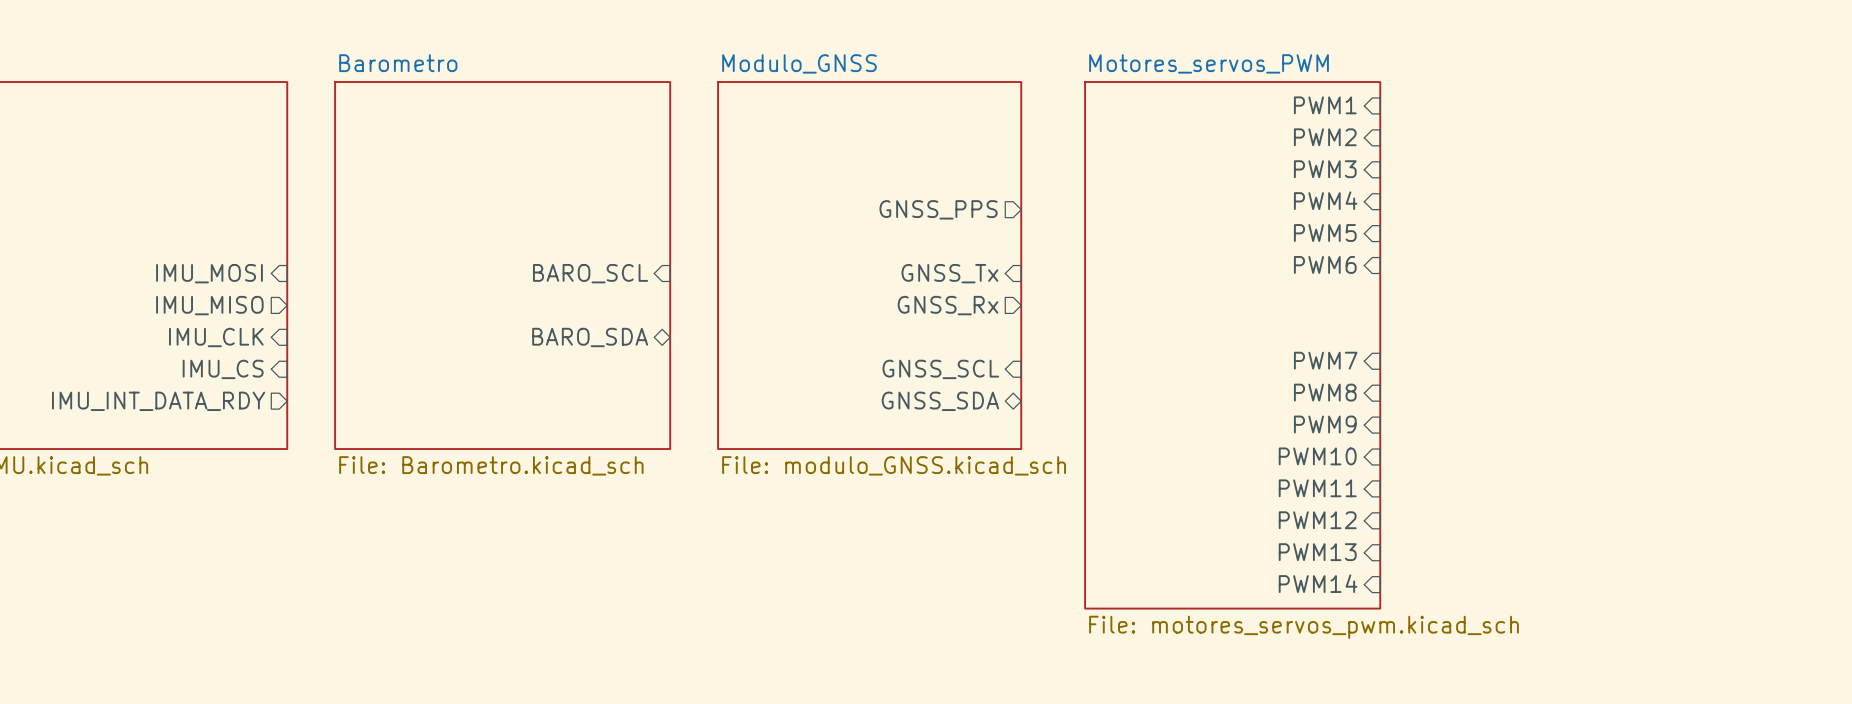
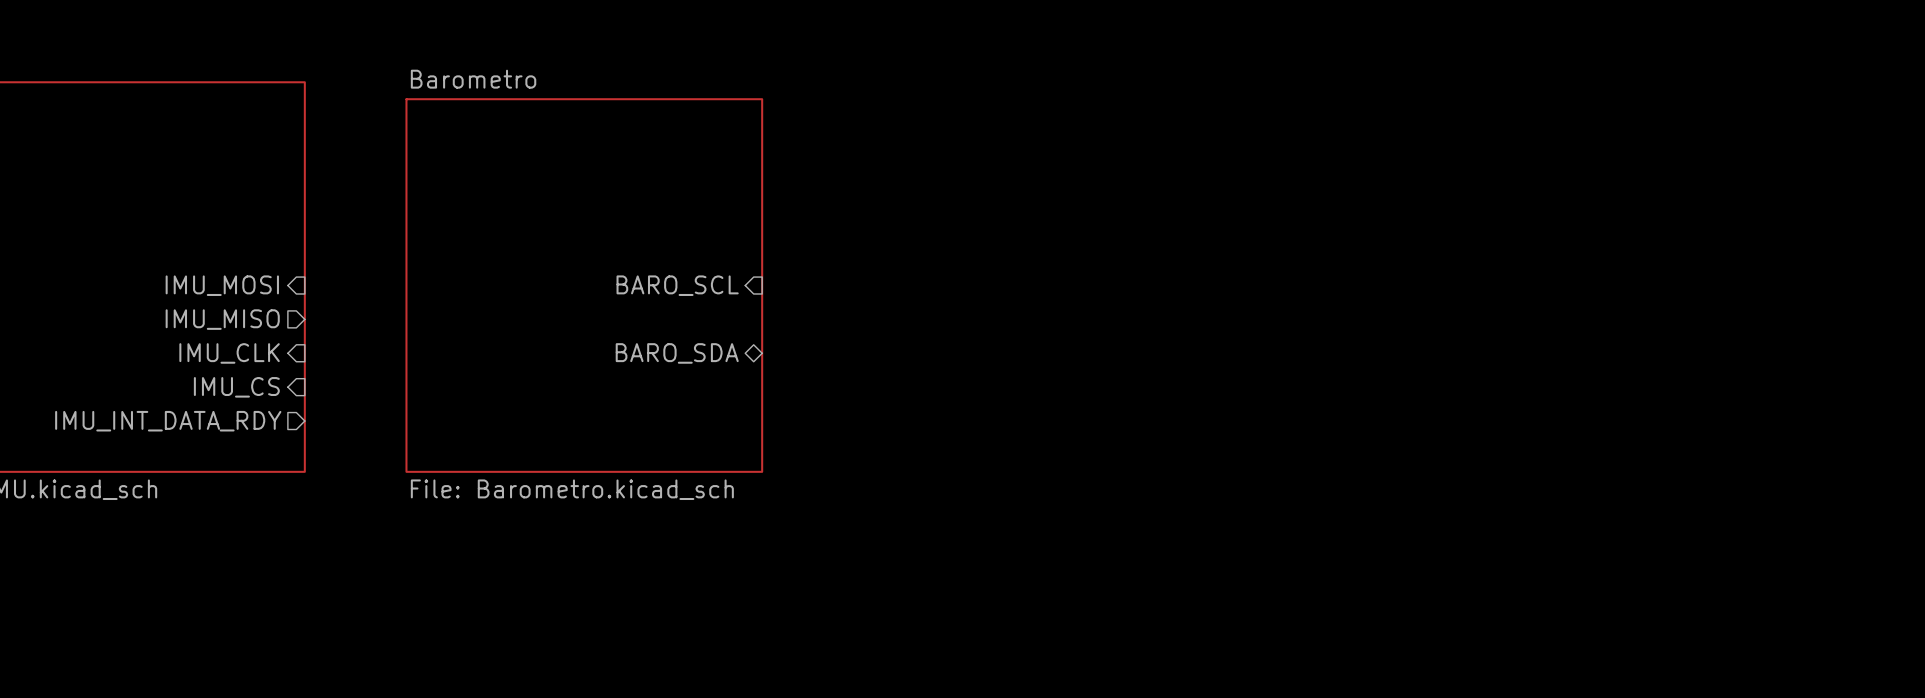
sheet pin: PWM1 (1325, 105) -> none
sheet pin: PWM2 (1325, 137) -> none
sheet pin: PWM3 (1325, 169) -> none
sheet pin: PWM4 (1325, 200) -> none
sheet pin: GNSS_PPS (938, 209) -> none
sheet pin: PWM5 (1325, 233) -> none
sheet pin: PWM6 (1325, 264) -> none
sheet Barometro: File: Barometro.kicad_sch (502, 265) -> none
sheet Modulo_GNSS: File: modulo_GNSS.kicad_sch (869, 265) -> none
sheet Barometro: none -> File: Barometro.kicad_sch (584, 285)
sheet pin position: BARO_SCL (590, 273) -> BARO_SCL (677, 285)
sheet pin: GNSS_Tx (949, 273) -> none
sheet pin: GNSS_Rx (948, 305) -> none
sheet pin position: BARO_SDA (590, 337) -> BARO_SDA (677, 353)
sheet Motores_servos_PWM: File: motores_servos_pwm.kicad_sch (1232, 345) -> none
sheet pin: PWM7 (1325, 360) -> none
sheet pin: GNSS_SCL (940, 369) -> none
sheet pin: PWM8 (1325, 392) -> none
sheet pin: GNSS_SDA (940, 401) -> none
sheet pin: PWM9 (1325, 424) -> none
sheet pin: PWM10 (1317, 456) -> none
sheet pin: PWM11 (1317, 488) -> none
sheet pin: PWM12 (1317, 520) -> none
sheet pin: PWM13 (1317, 552) -> none
sheet pin: PWM14 (1318, 583) -> none

